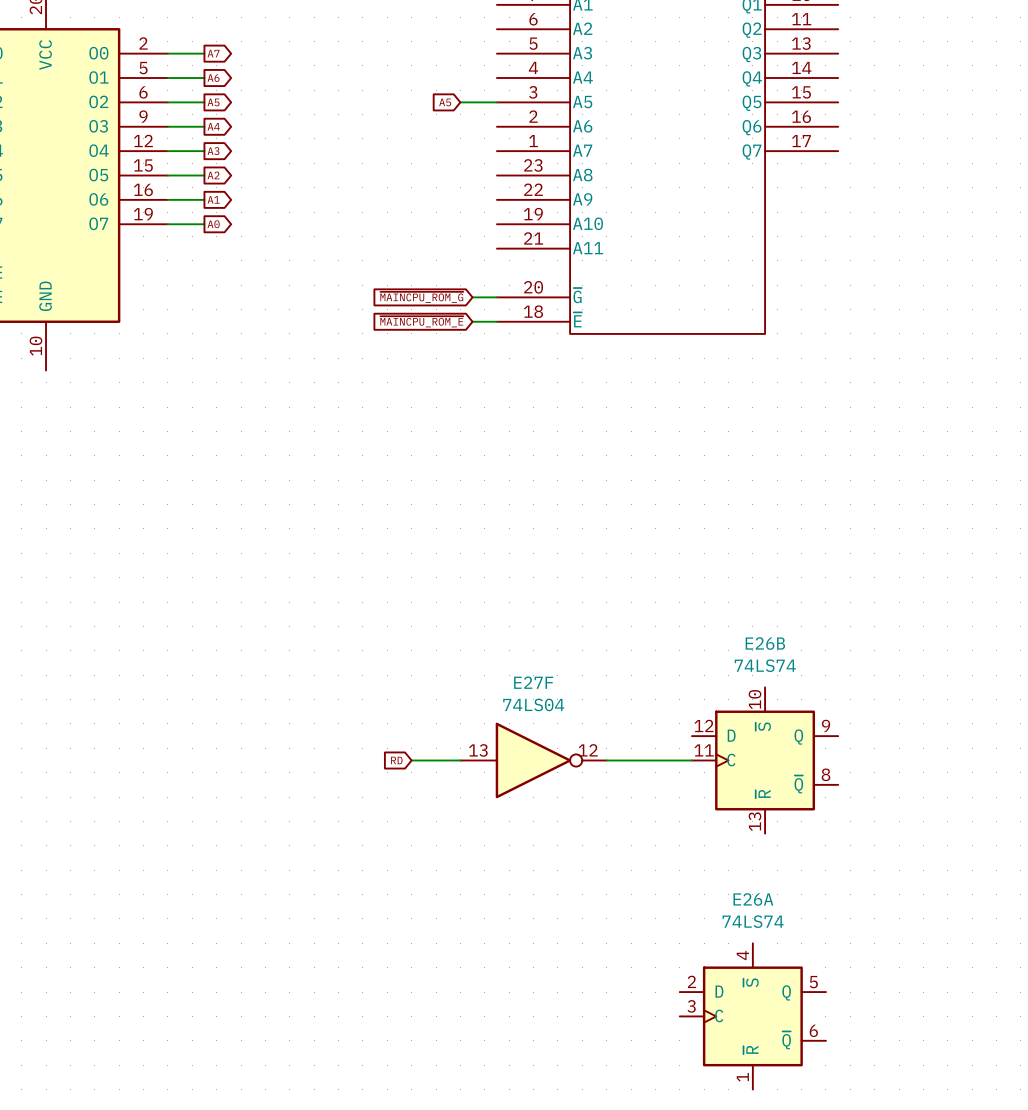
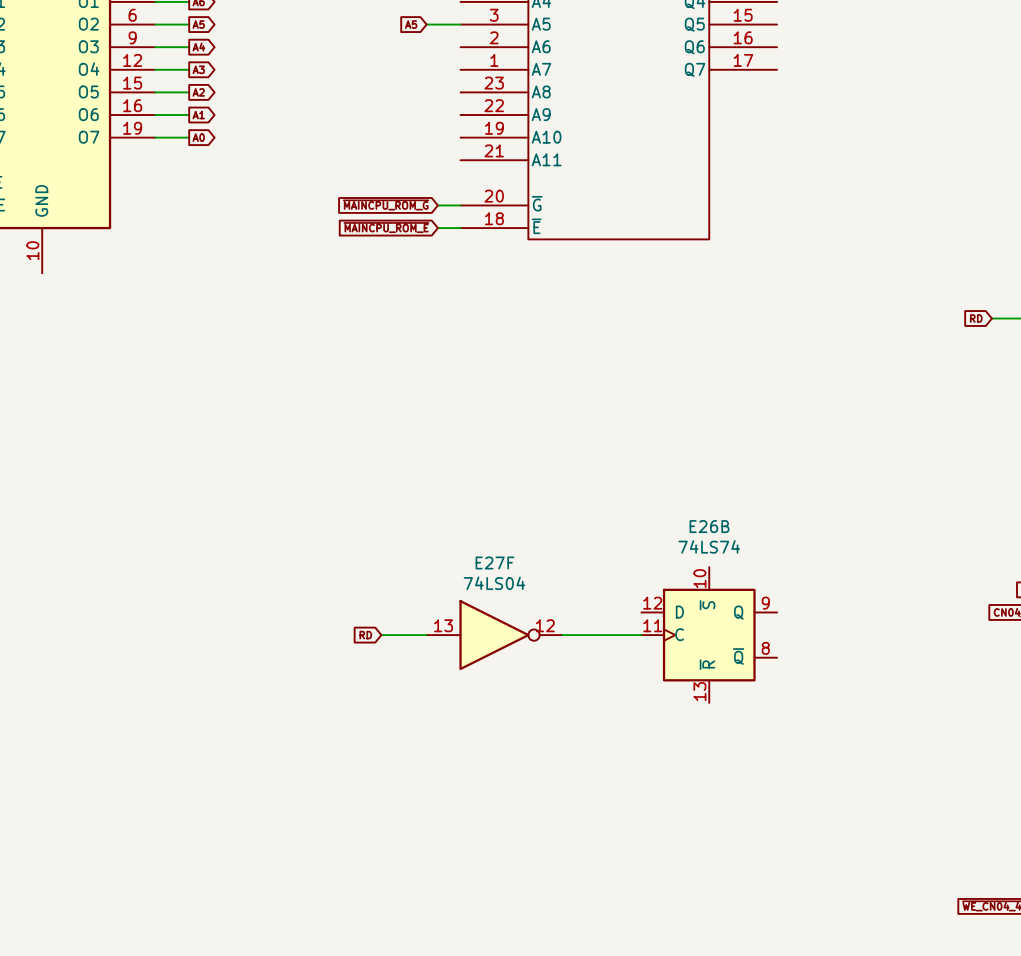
E26A: 74LS74 (752, 1016) -> none

